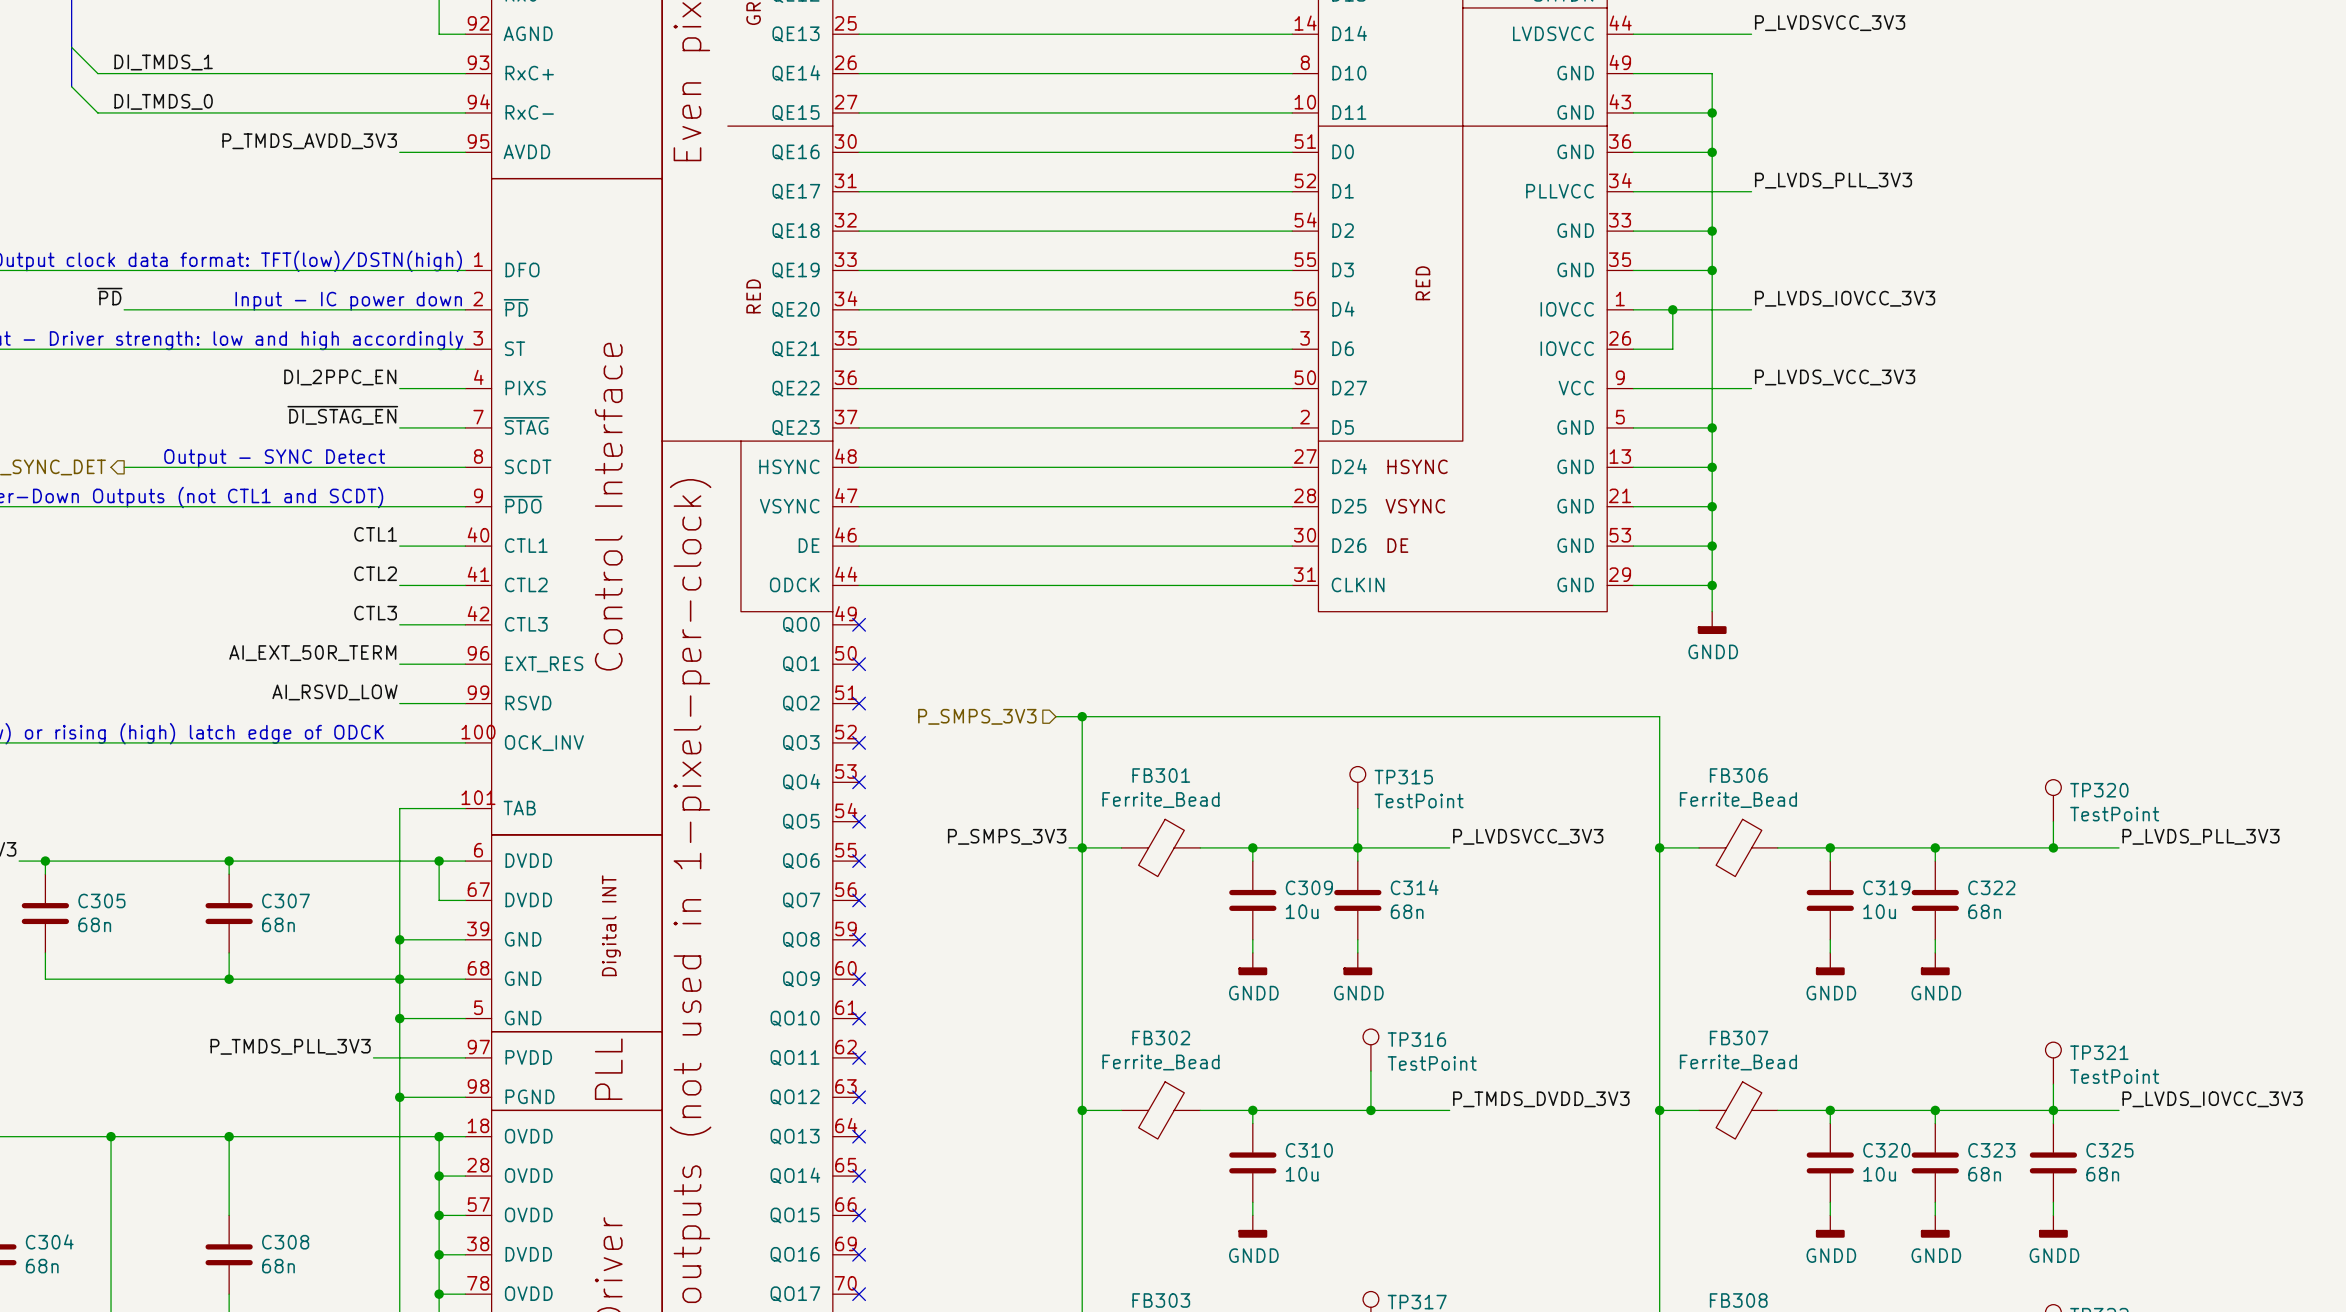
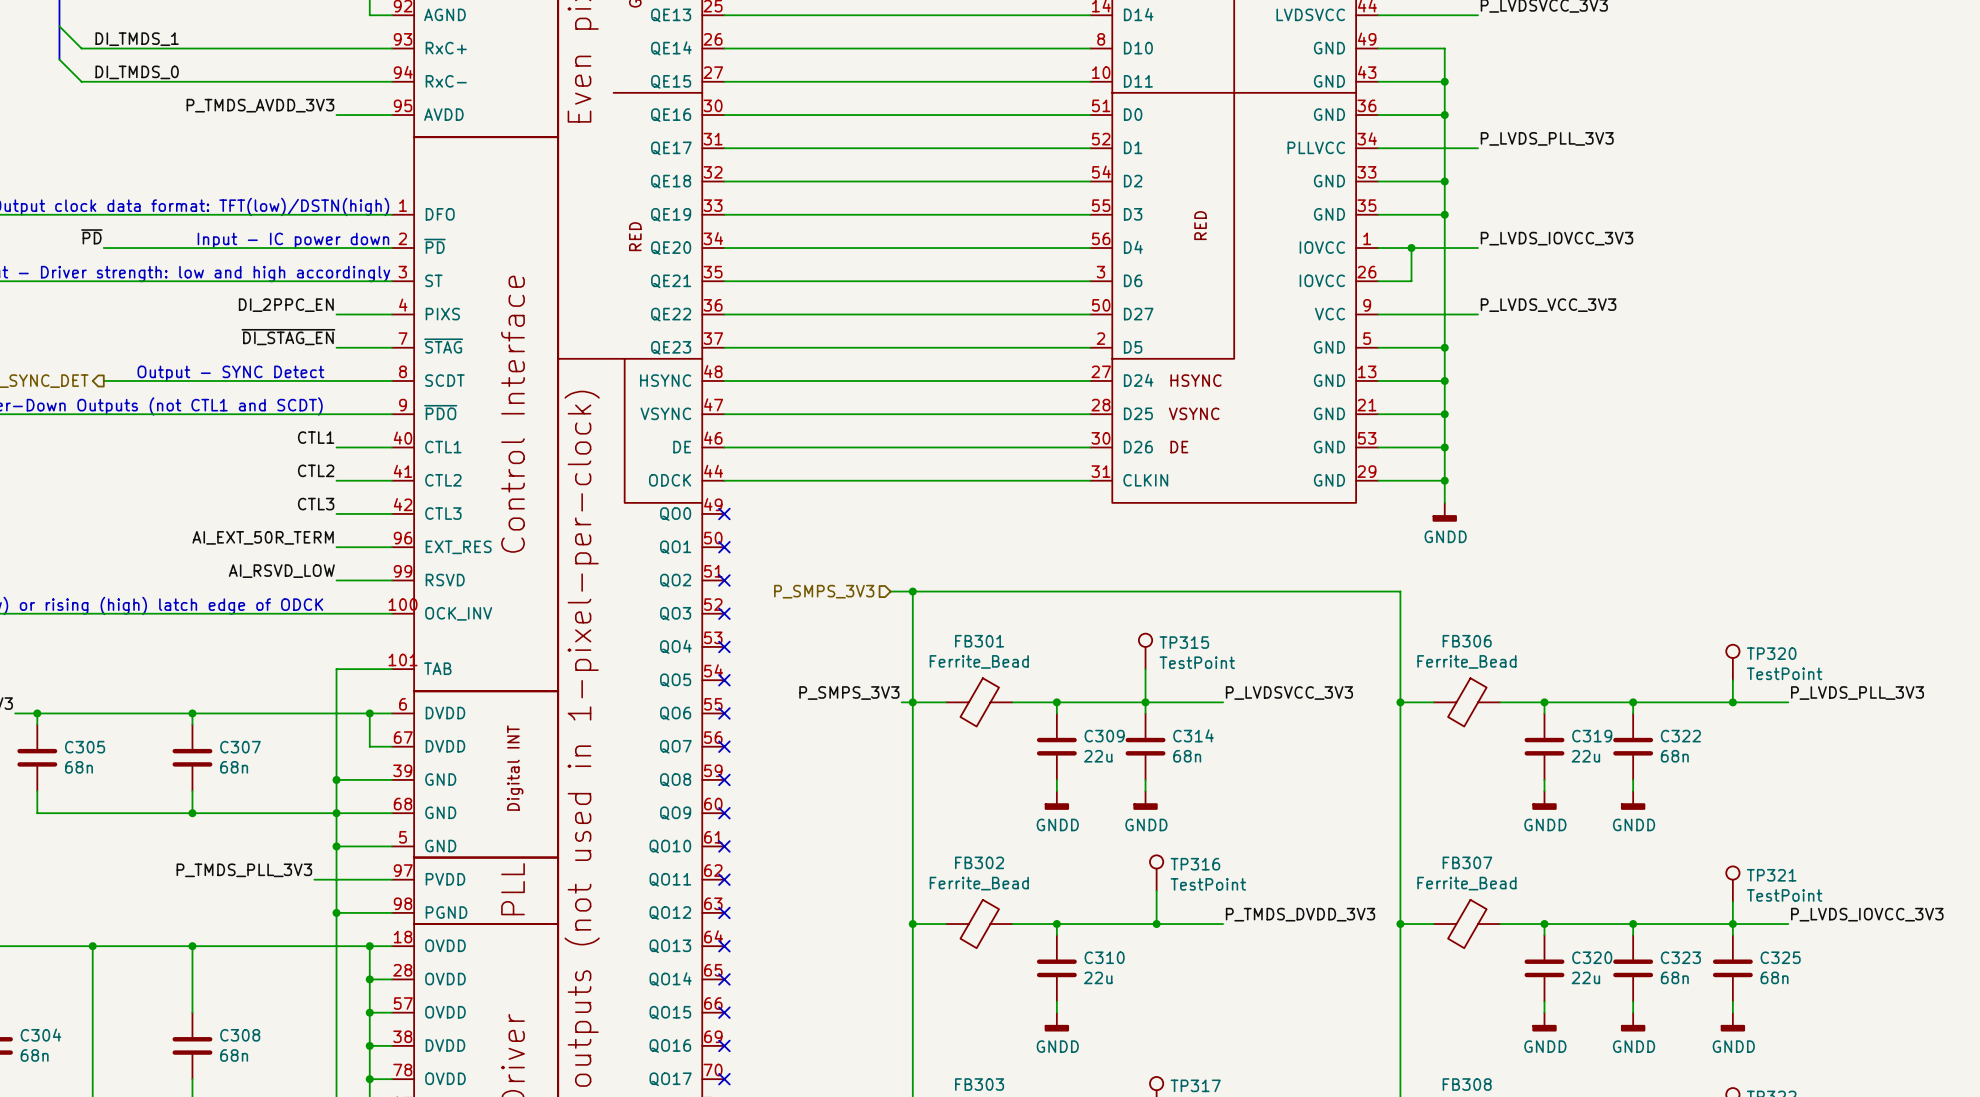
C309 value: 10u (1302, 911) -> 22u (1098, 756)
C319 value: 10u (1879, 911) -> 22u (1585, 756)
C310 value: 10u (1302, 1174) -> 22u (1098, 977)
C320 value: 10u (1879, 1174) -> 22u (1585, 977)

